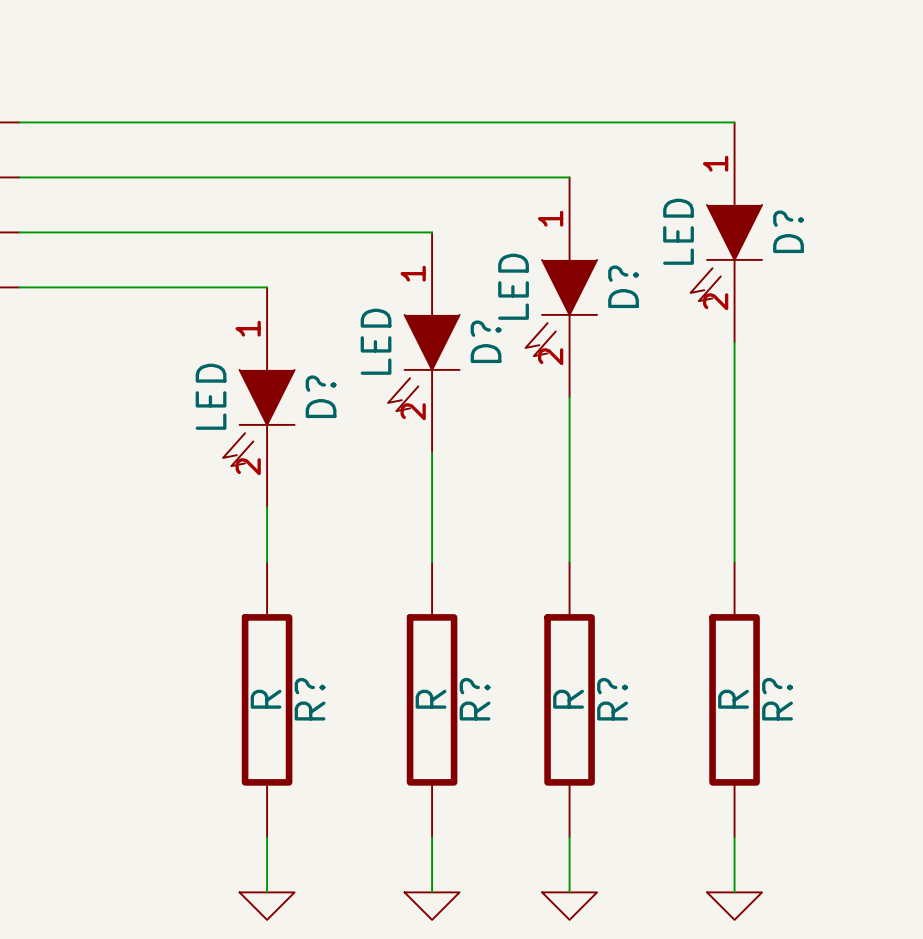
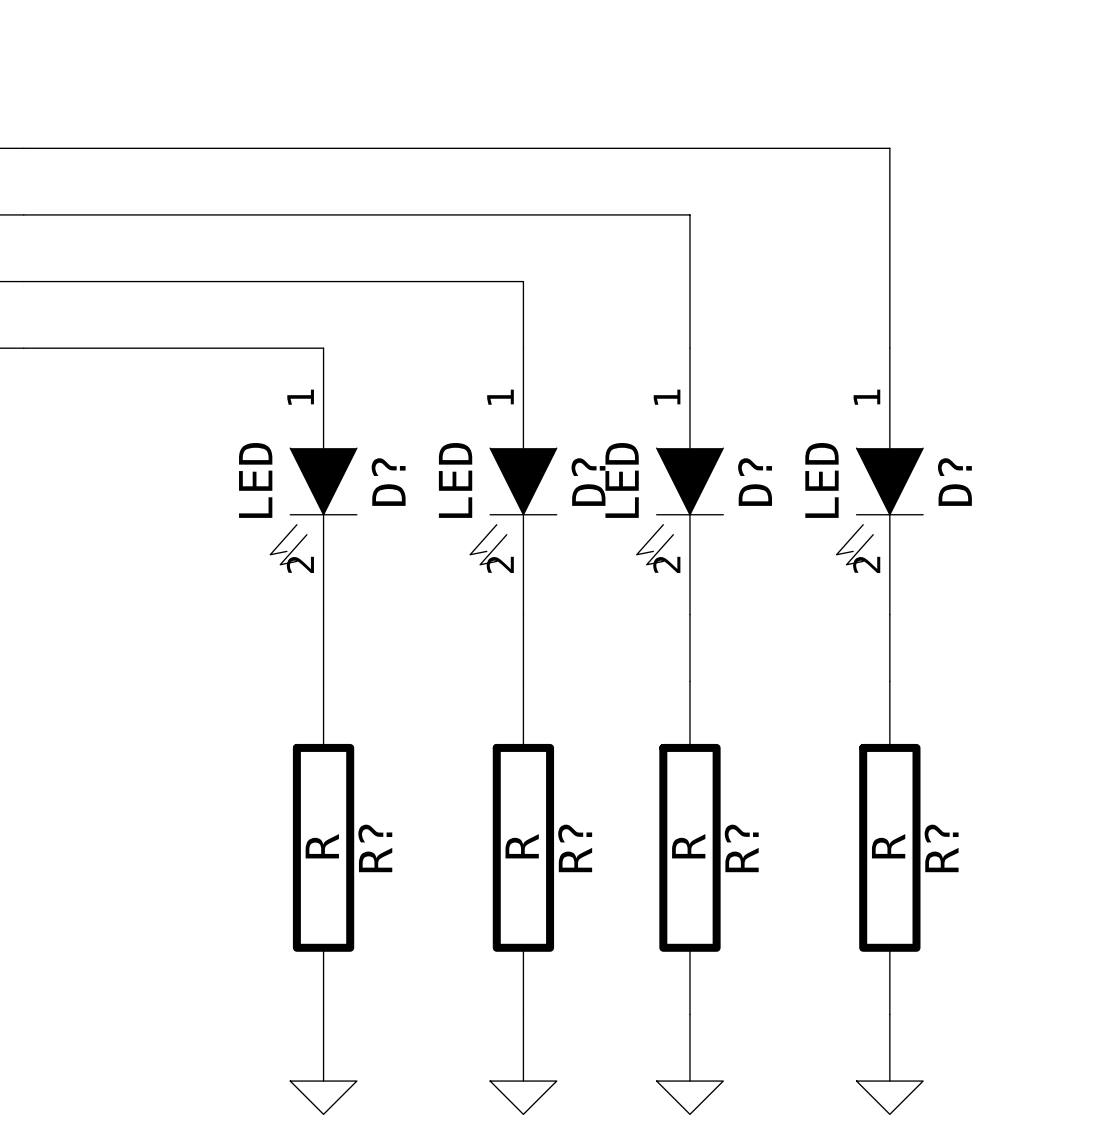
D?: LED (726, 232) -> none
D?: LED (561, 287) -> none
D? position: (423, 342) -> (513, 481)
D?: none -> LED (679, 481)
D?: none -> LED (879, 481)

